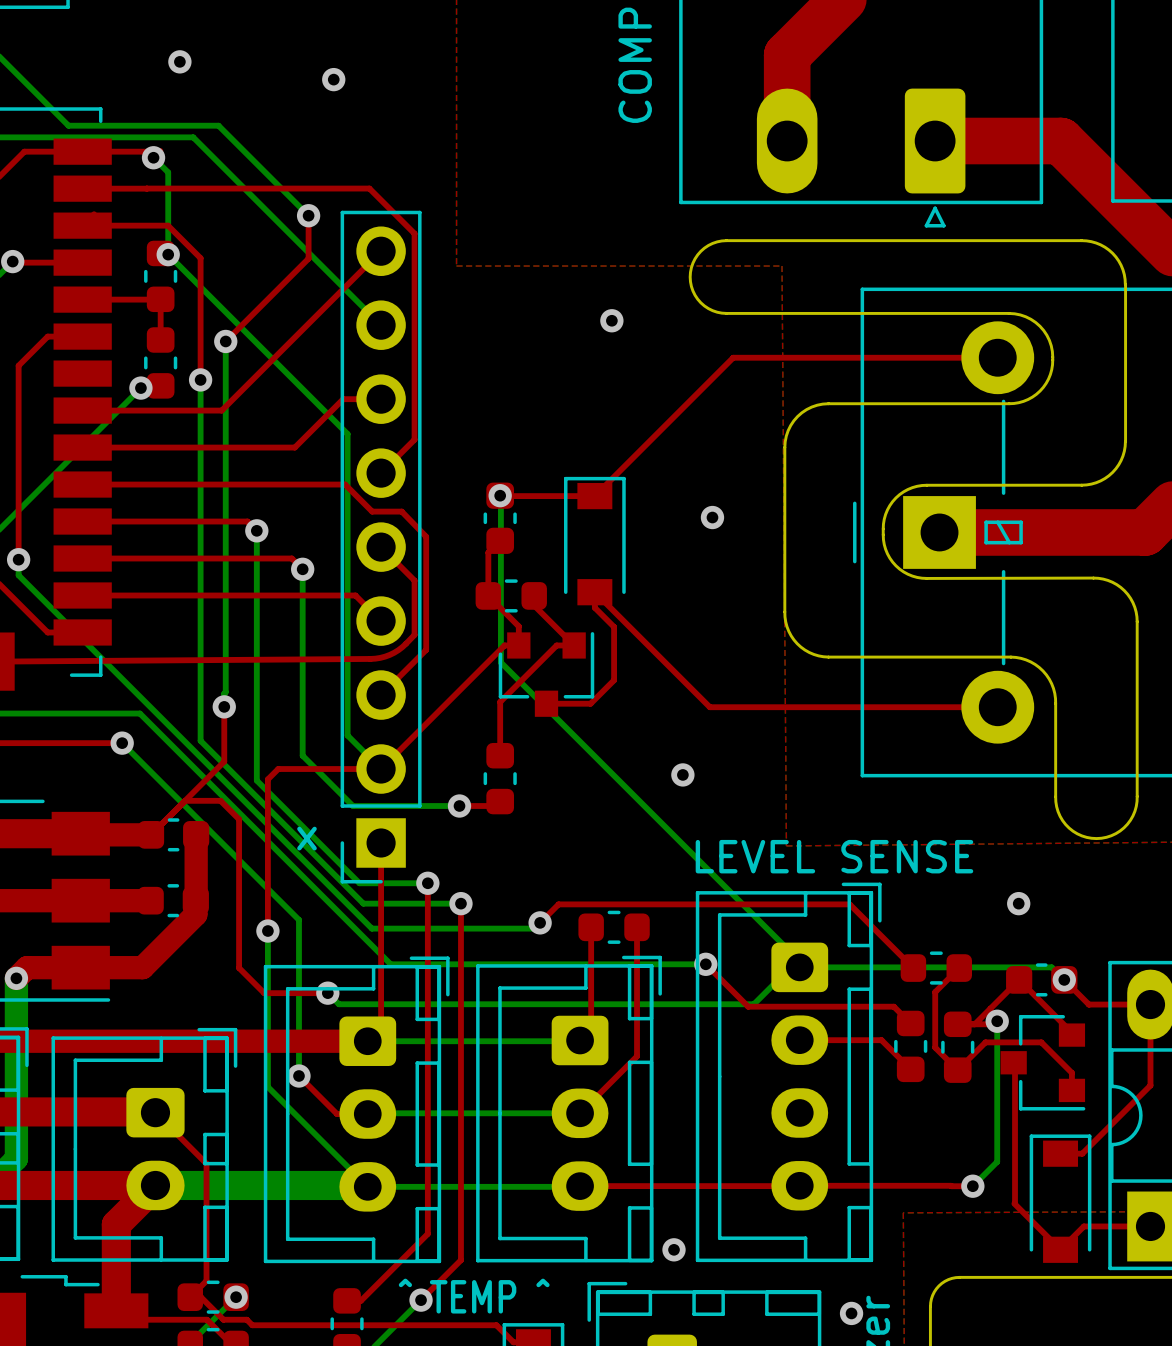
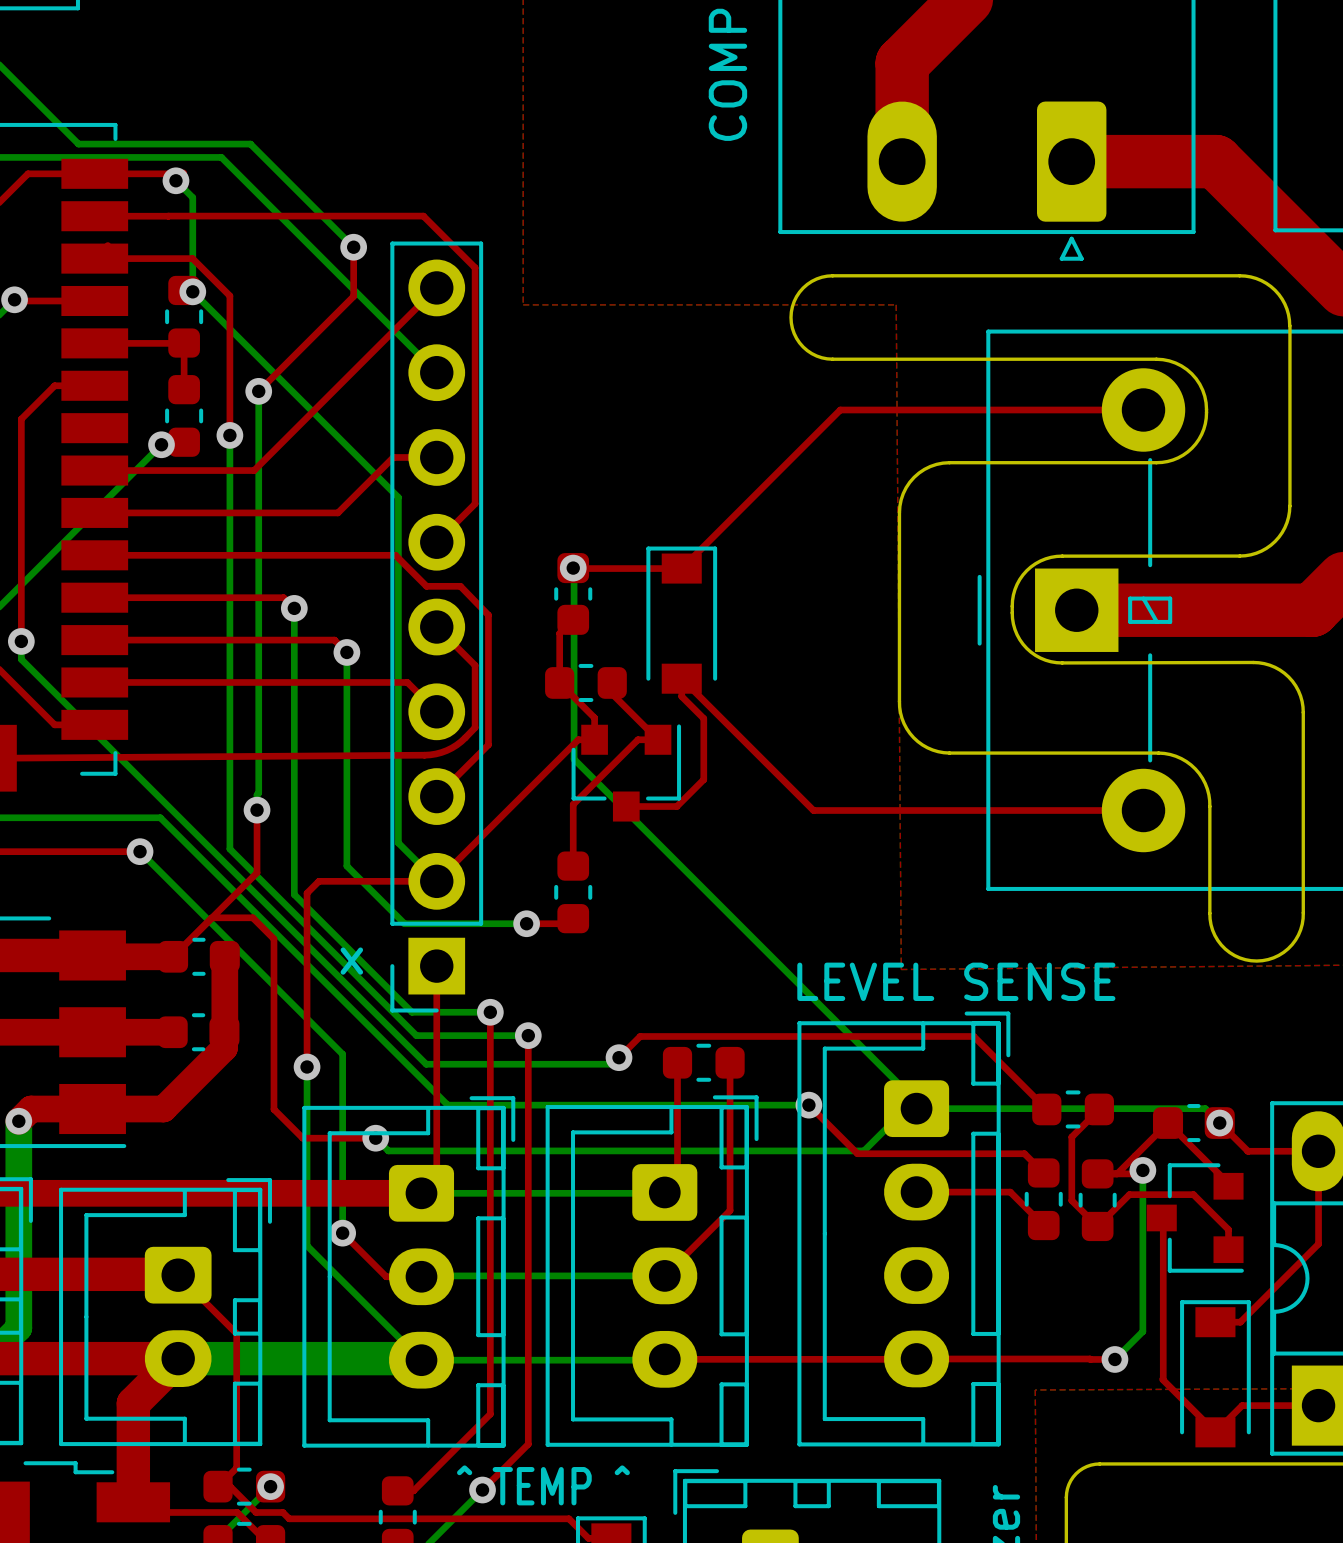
via: (179, 61) -> none
via: (333, 79) -> none
via: (611, 320) -> none
via: (712, 517) -> none
via: (682, 774) -> none
via: (1018, 903) -> none
via: (674, 1249) -> none
via: (851, 1313) -> none

